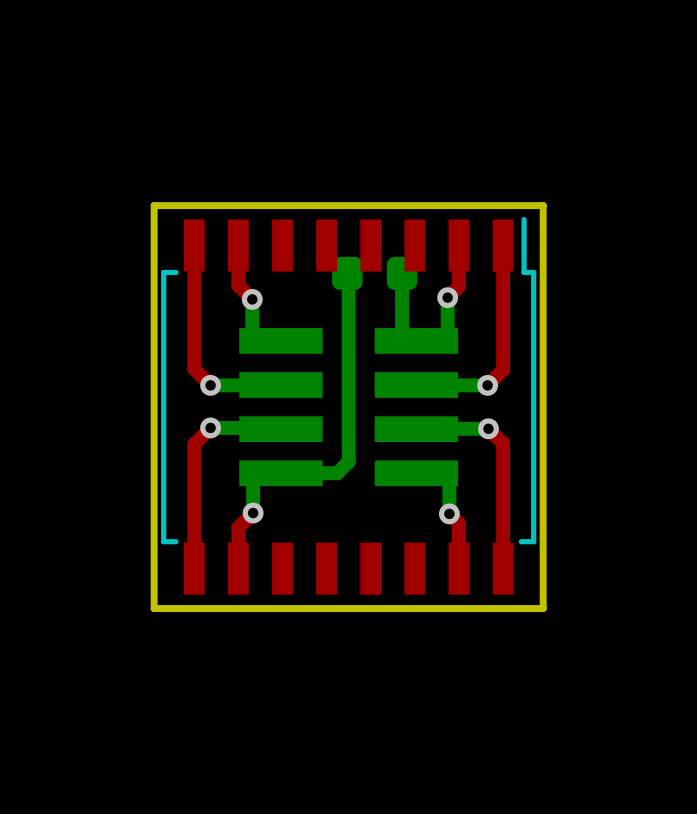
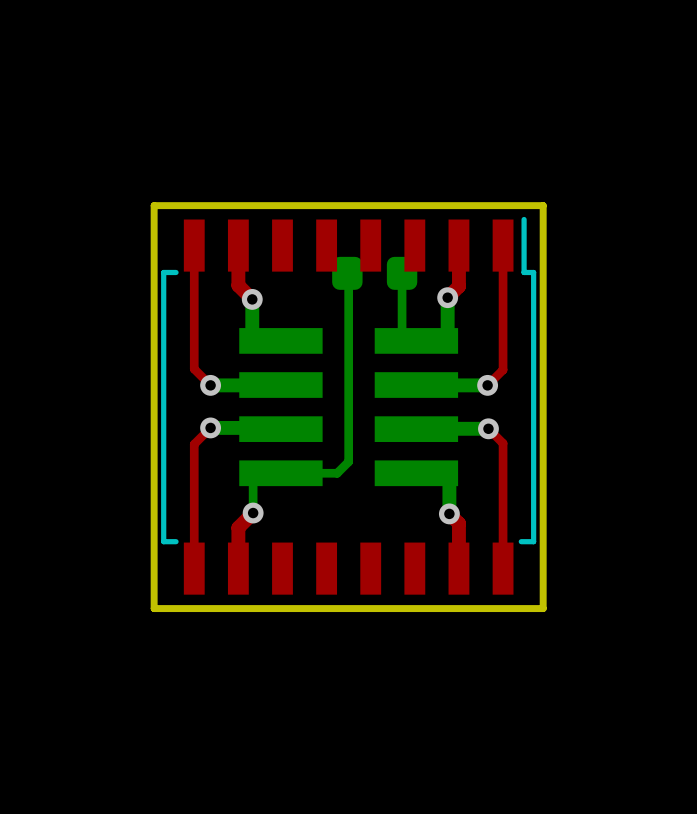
top track width: thick (194, 245) (194, 369) (210, 385) -> thin (194, 245) (194, 369) (210, 385)
top track width: thick (503, 245) (503, 369) (487, 385) -> thin (503, 245) (503, 369) (487, 385)
bottom track width: thick (347, 273) (348, 461) (337, 473) (259, 473) (253, 480) (253, 513) -> thin (347, 273) (348, 461) (337, 473) (259, 473) (253, 480) (253, 513)
bottom track width: thick (402, 273) (402, 340) -> thin (402, 273) (402, 340)
top track width: thick (210, 427) (194, 444) (194, 568) -> thin (210, 427) (194, 444) (194, 568)
top track width: thick (488, 428) (503, 443) (503, 568) -> thin (488, 428) (503, 443) (503, 568)

